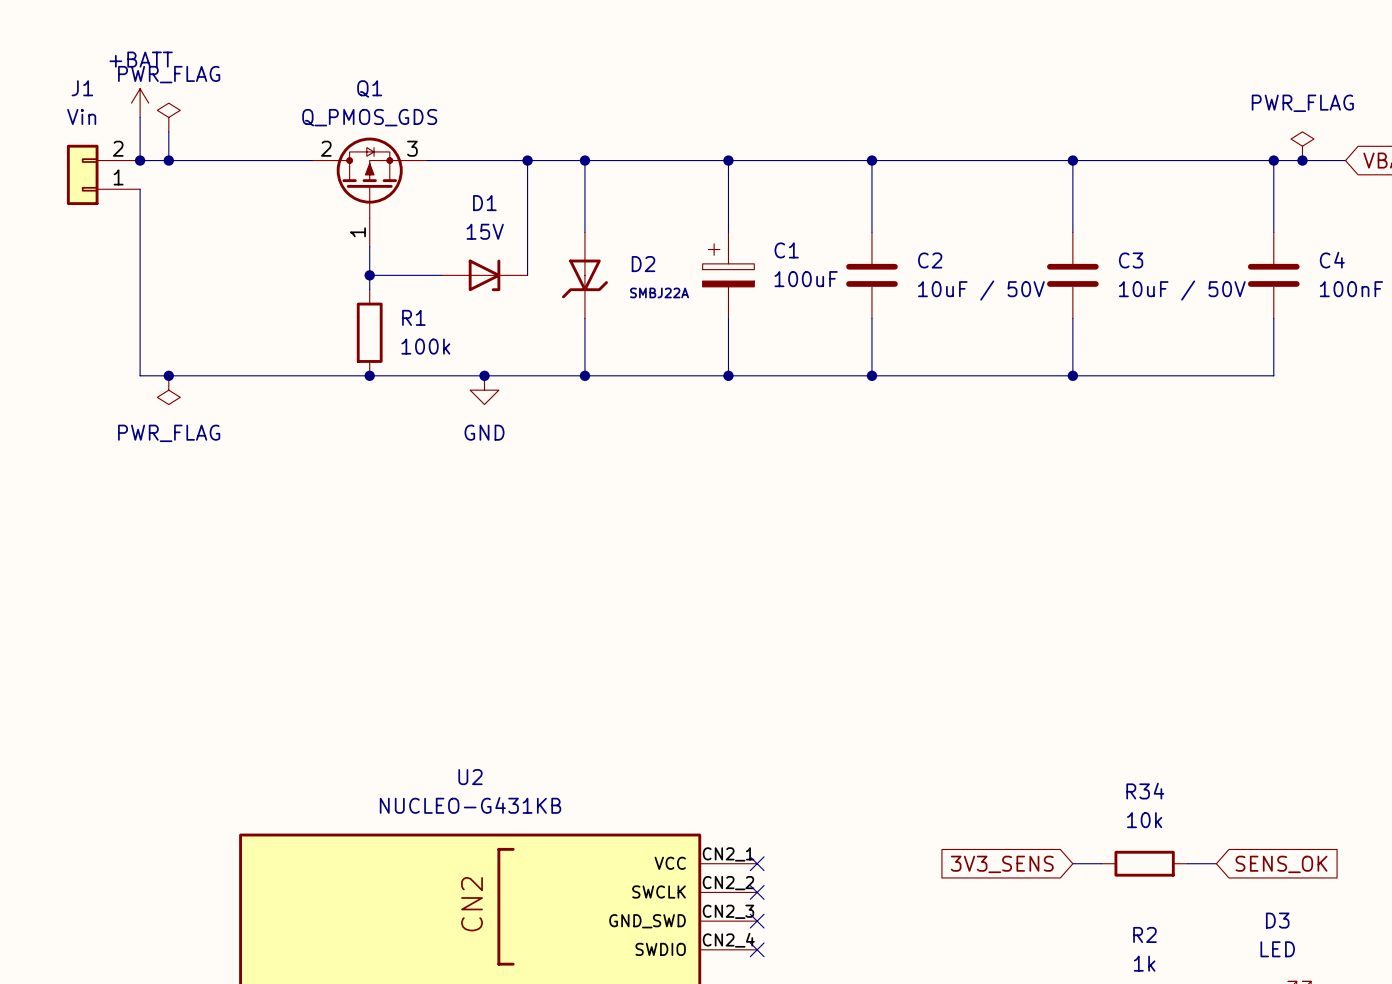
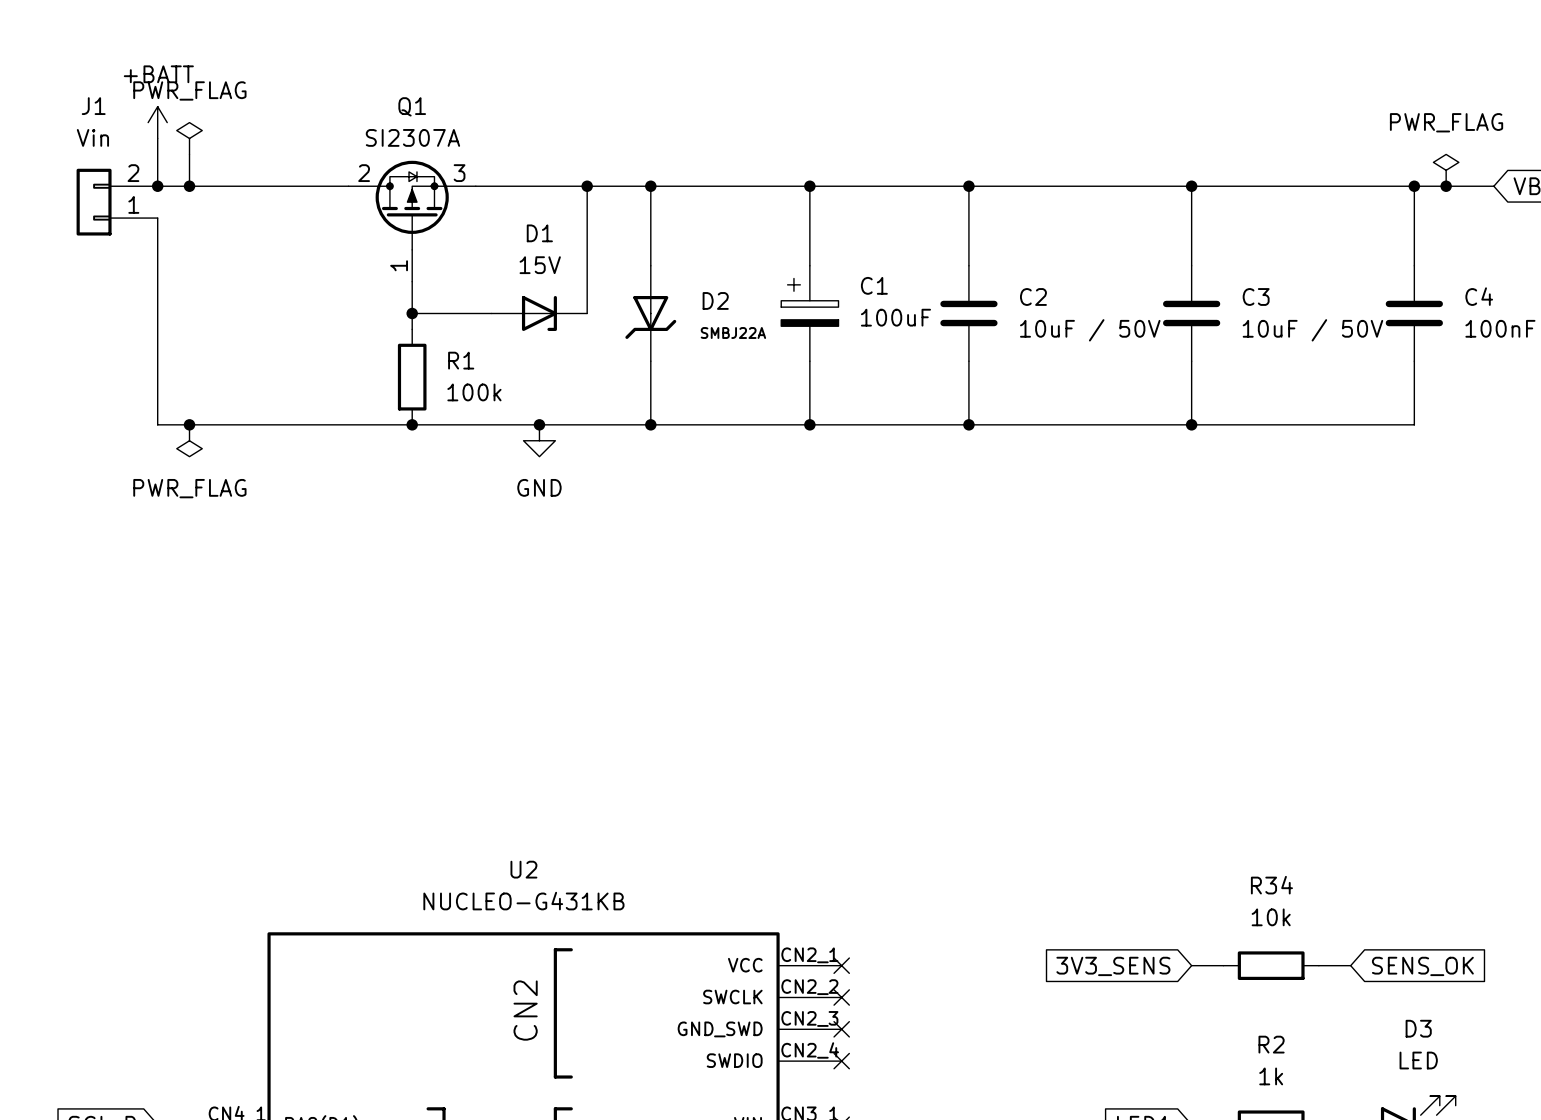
Q1 value: Q_PMOS_GDS (369, 117) -> SI2307A (412, 137)

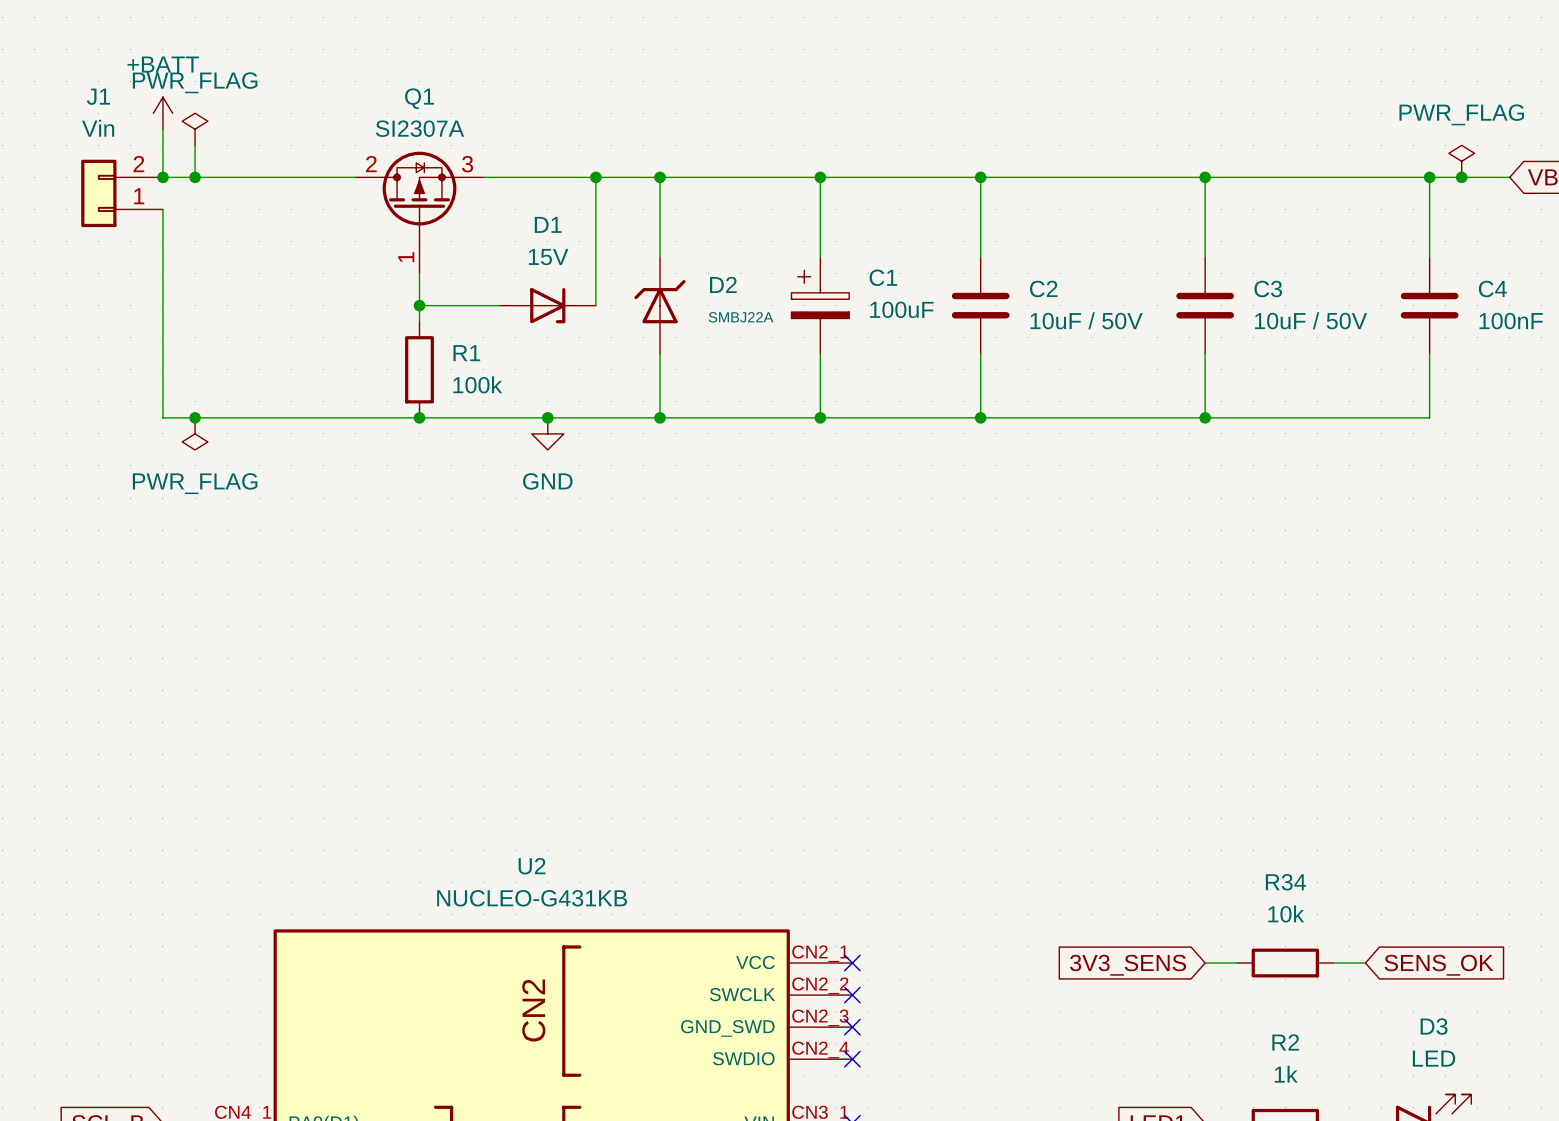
D2 rotation: 0° (650, 317) -> 180° (660, 301)

